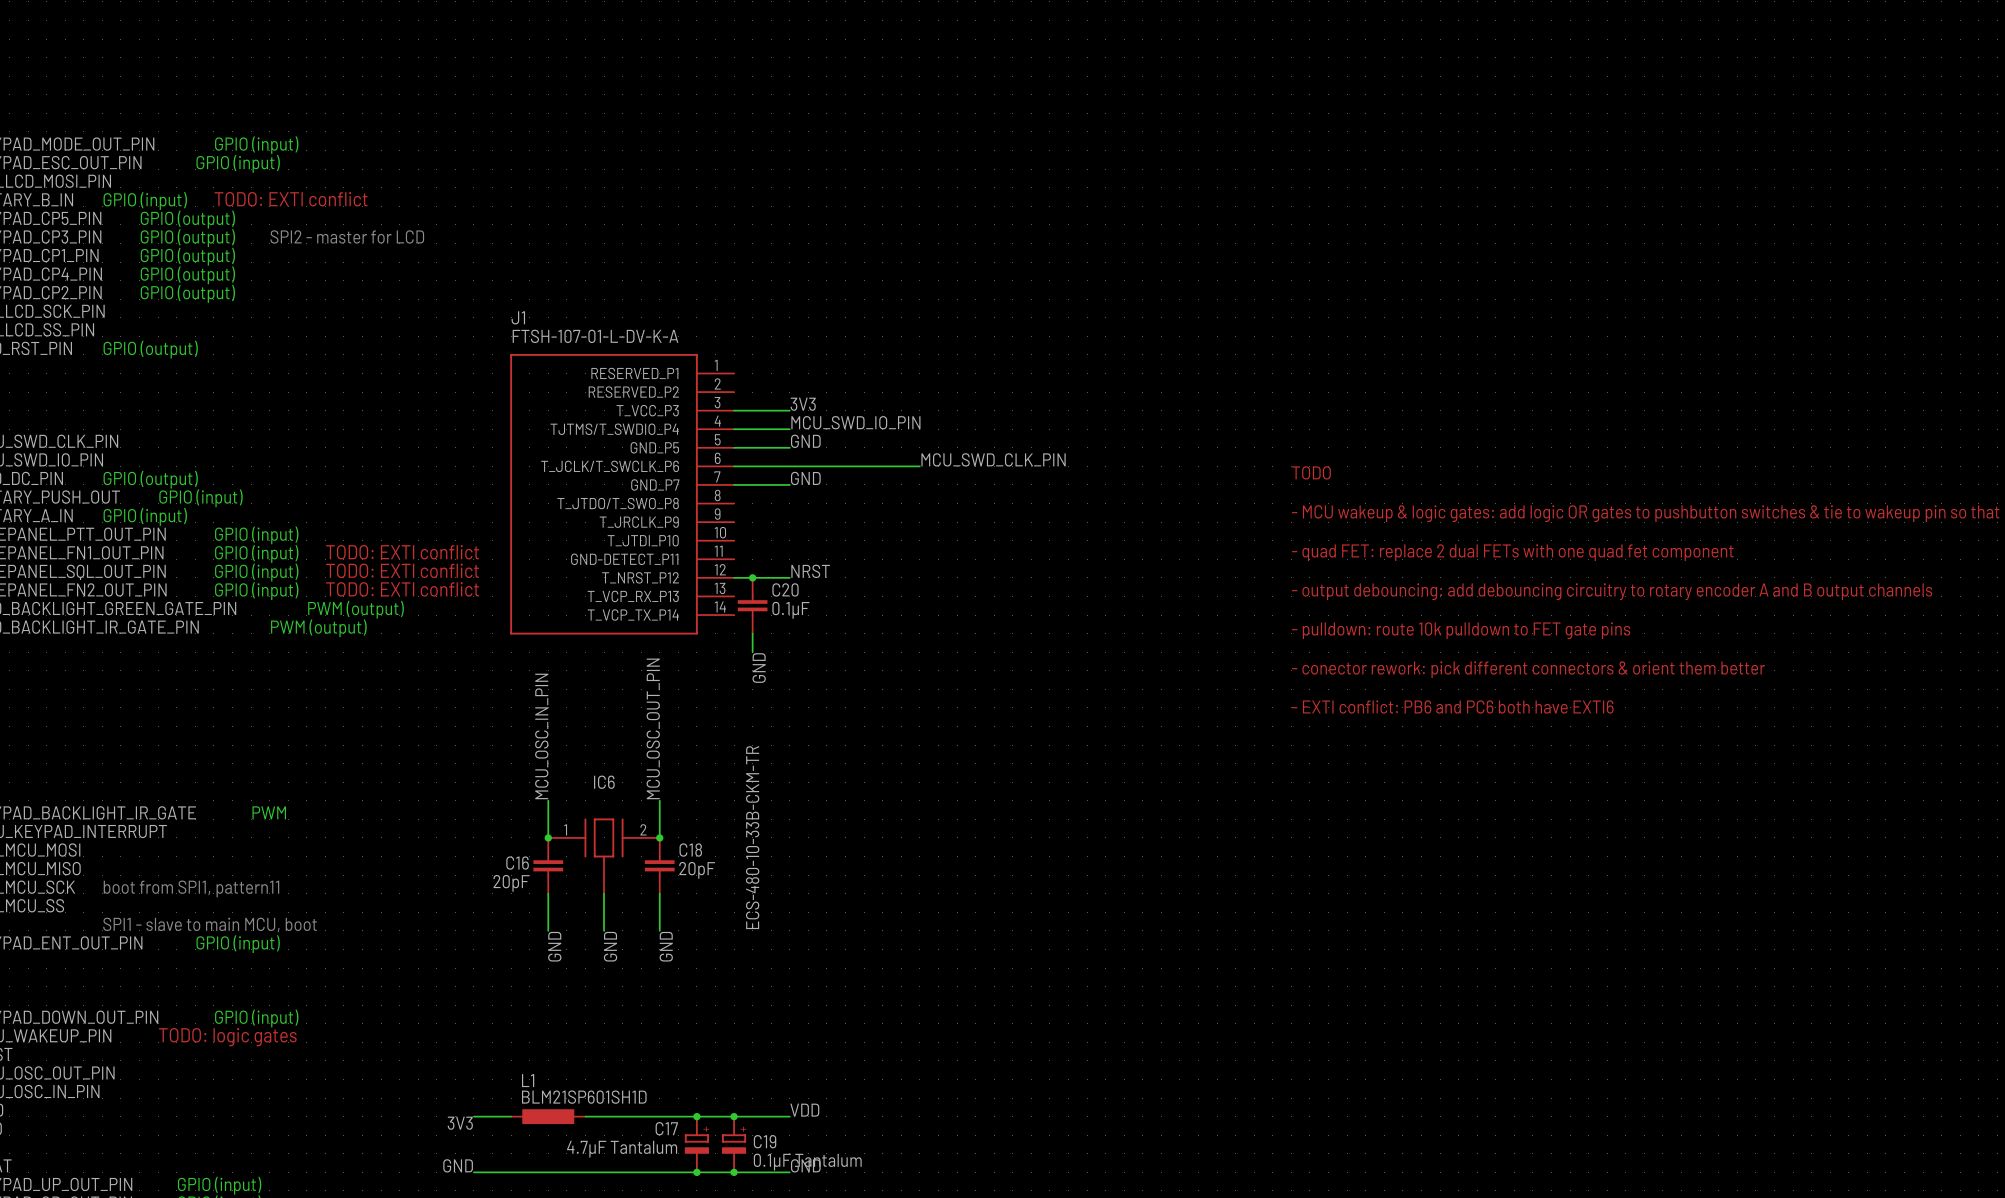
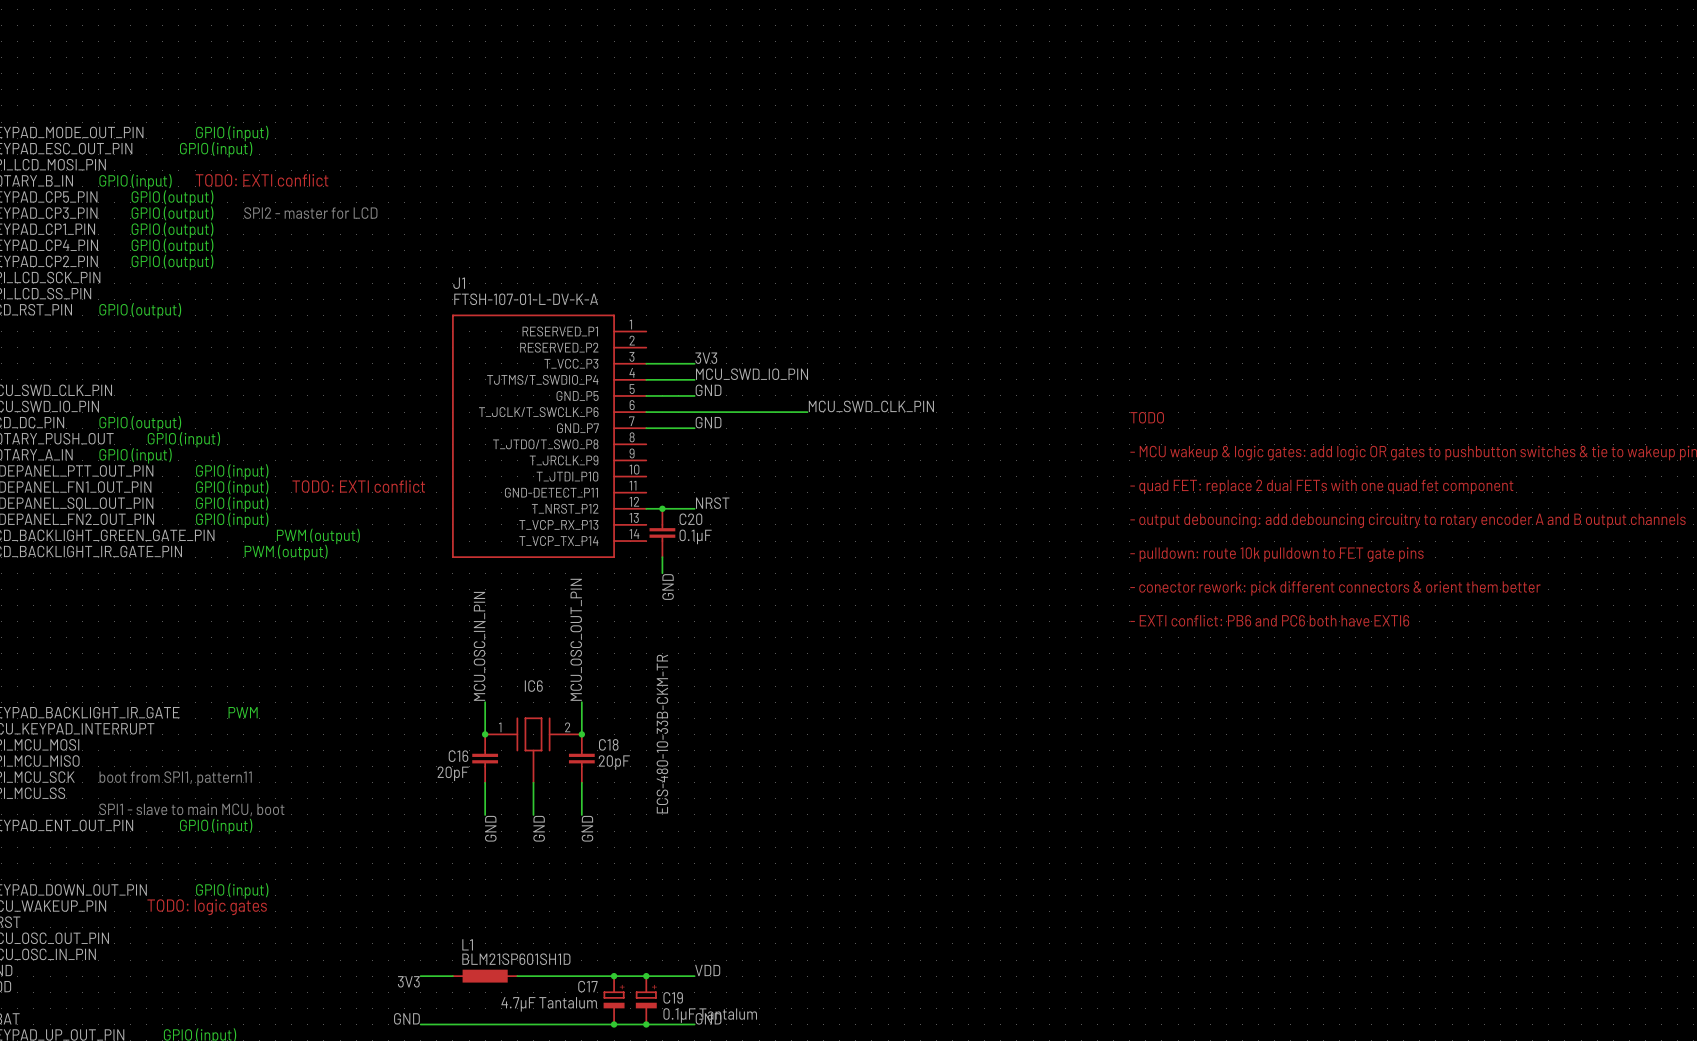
text: TODO: EXTI conflict (402, 570) -> none
text: TODO: EXTI conflict (402, 589) -> none

